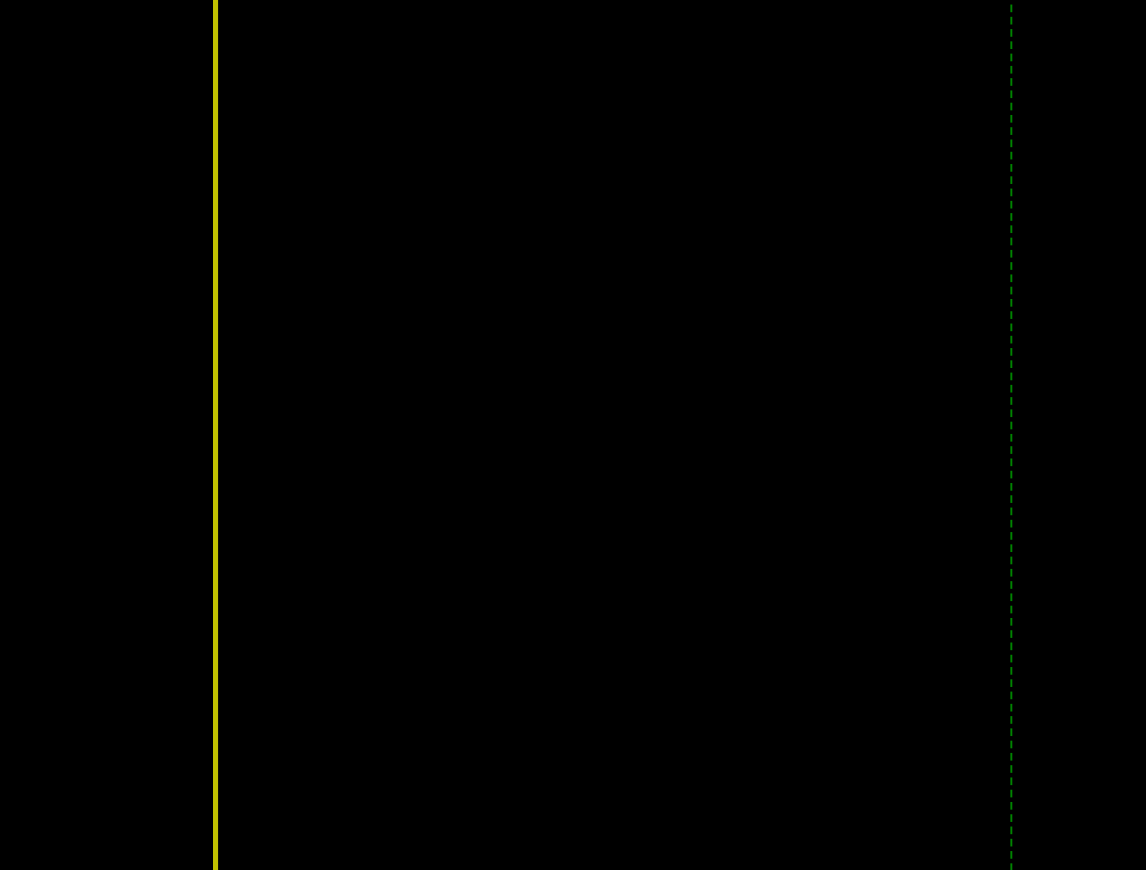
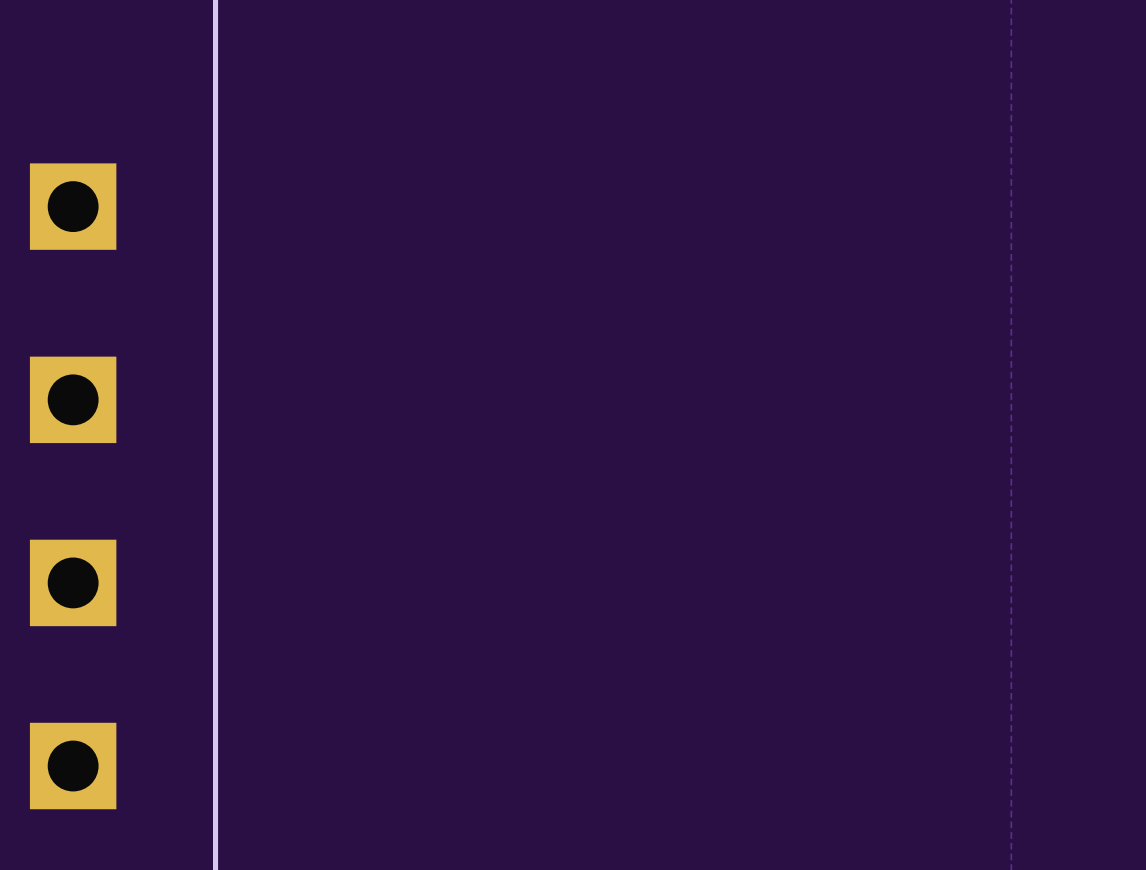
part: none -> (73, 206)
part: none -> (73, 399)
part: none -> (73, 582)
part: none -> (73, 766)

